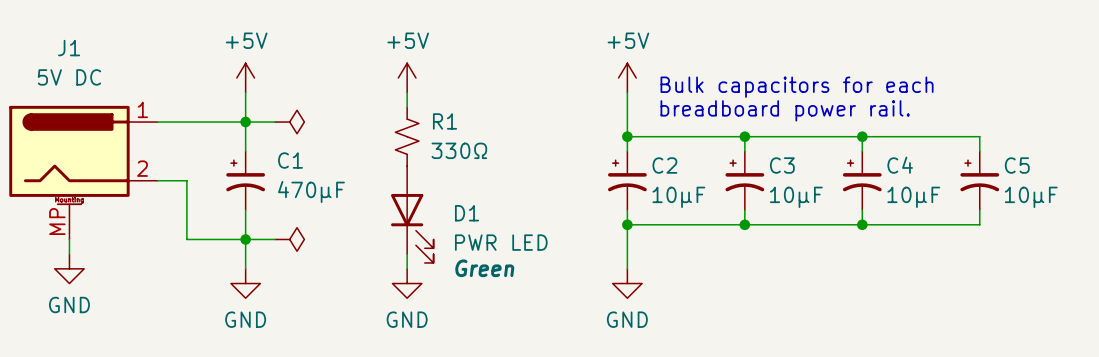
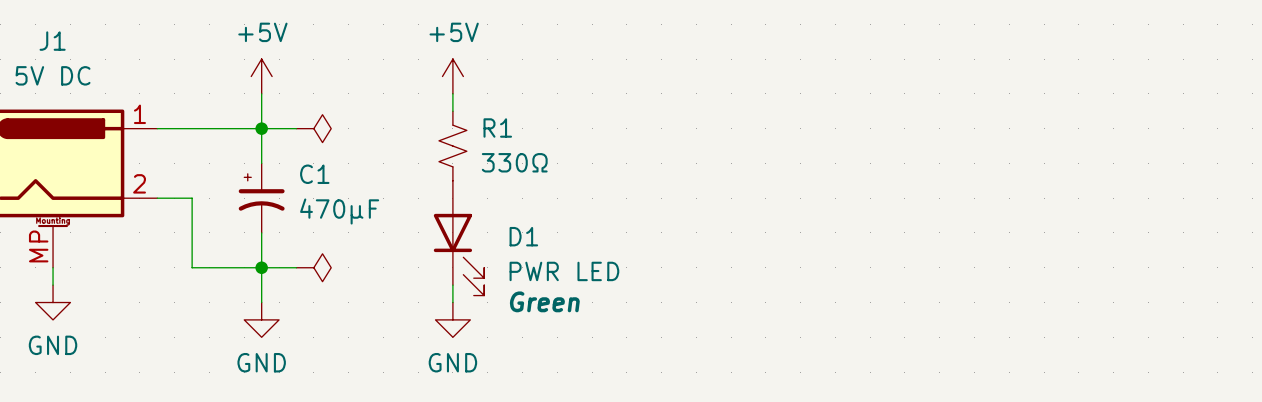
power symbol: +5V (627, 77) -> none
text: Bulk capacitors for each (797, 87) -> none
wire: (627, 92) (627, 151) -> none
text: breadboard power rail. (785, 110) -> none
wire: (627, 136) (979, 136) (979, 151) -> none
junction: (627, 136) -> none
wire: (744, 136) (744, 151) -> none
junction: (744, 136) -> none
wire: (862, 136) (862, 151) -> none
junction: (862, 136) -> none
C2: 10µF (627, 180) -> none
C3: 10µF (744, 180) -> none
C4: 10µF (862, 180) -> none
C5: 10µF (979, 180) -> none
wire: (627, 210) (627, 268) -> none
wire: (744, 210) (744, 224) -> none
wire: (862, 210) (862, 224) -> none
wire: (979, 210) (979, 224) (627, 224) -> none
junction: (627, 224) -> none
junction: (744, 224) -> none
junction: (862, 224) -> none
power symbol: GND (627, 283) -> none

